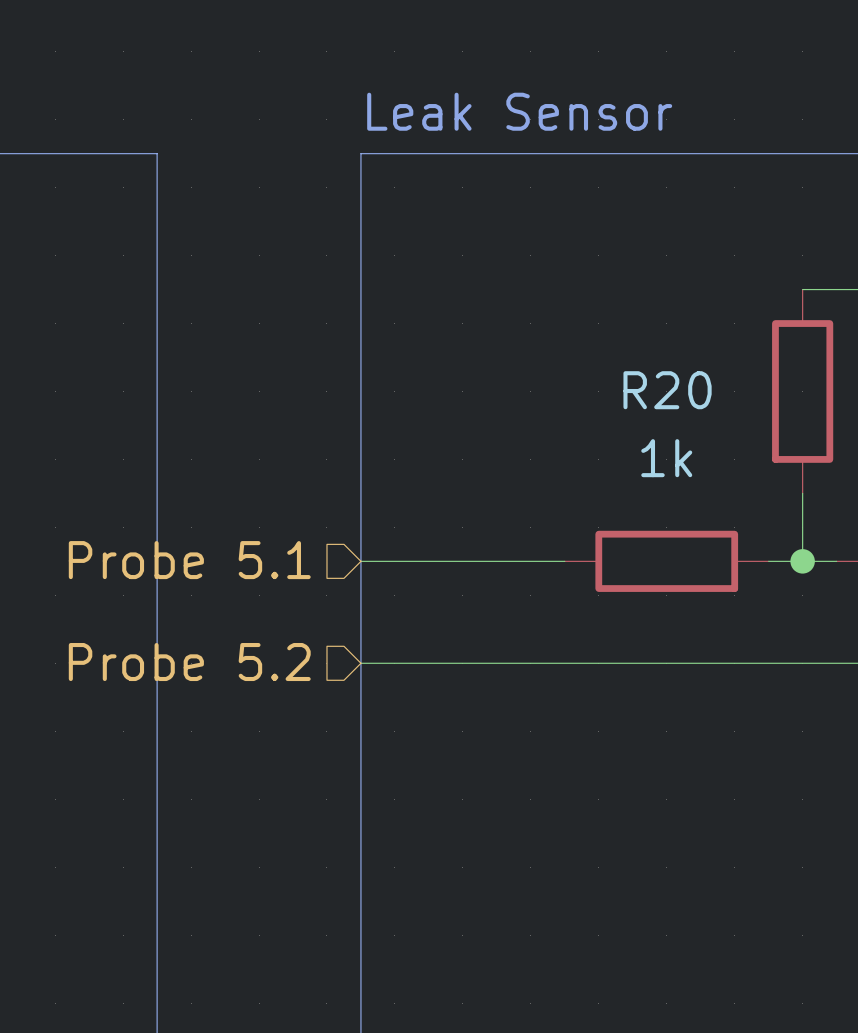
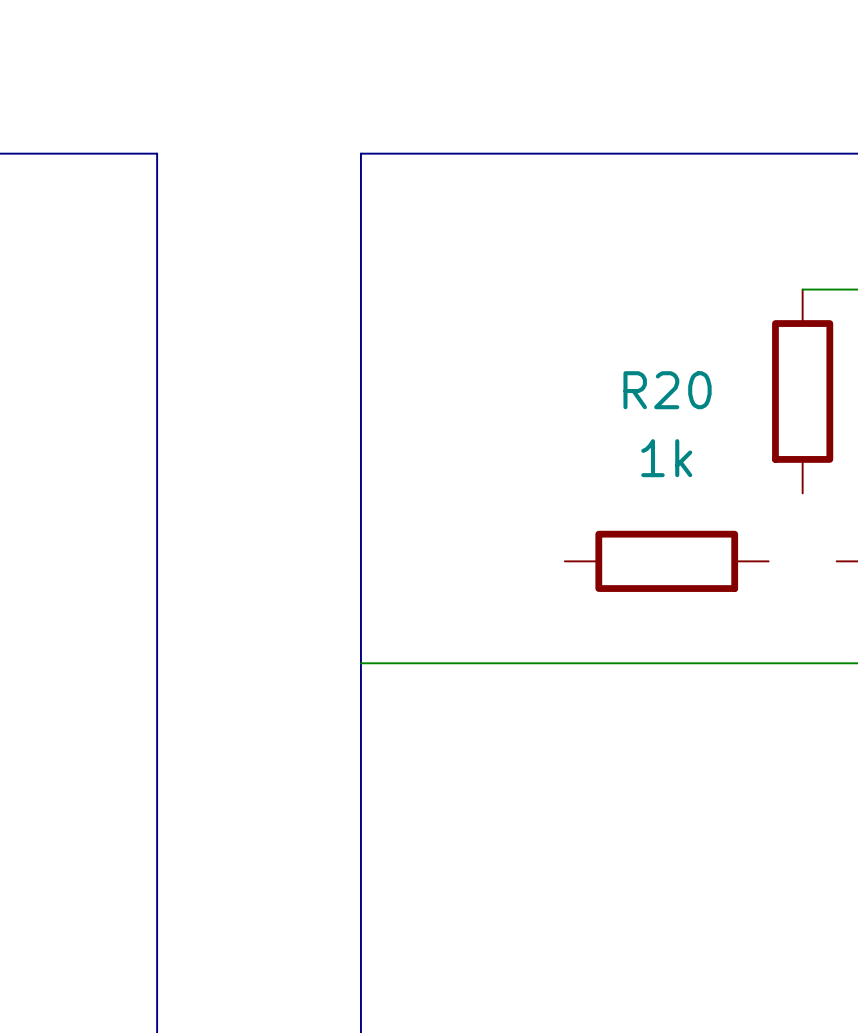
text: Leak Sensor (519, 111) -> none
wire: (802, 493) (802, 561) -> none
hierarchical label: Probe 5.1 (189, 560) -> none
wire: (360, 561) (564, 561) -> none
wire: (768, 561) (836, 561) -> none
junction: (802, 561) -> none
hierarchical label: Probe 5.2 (189, 662) -> none

